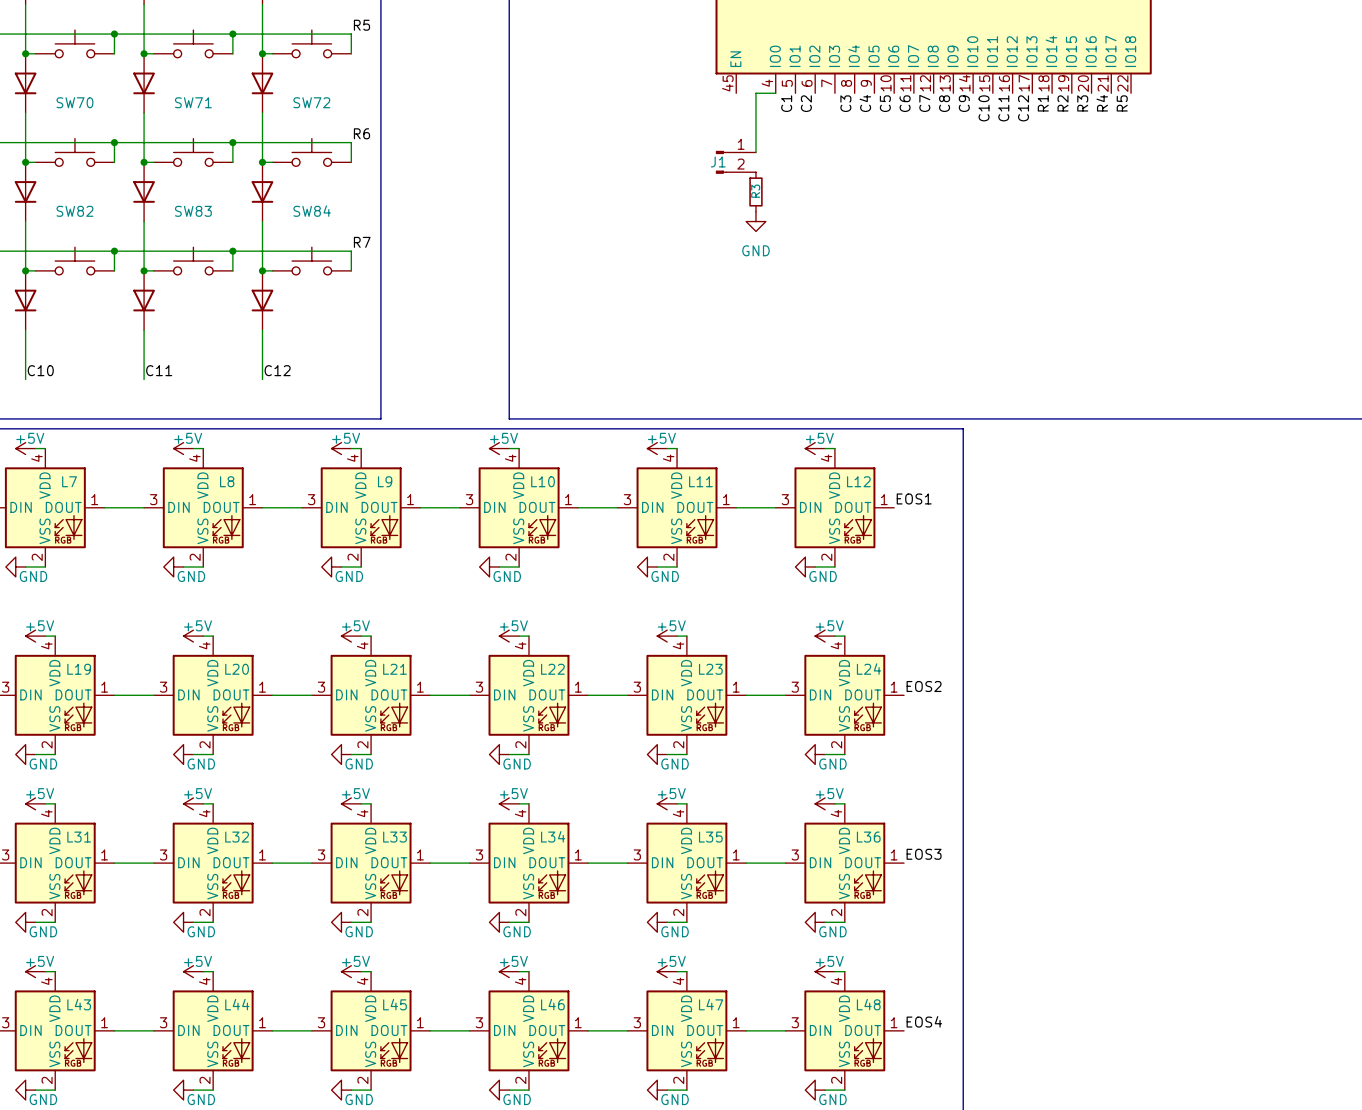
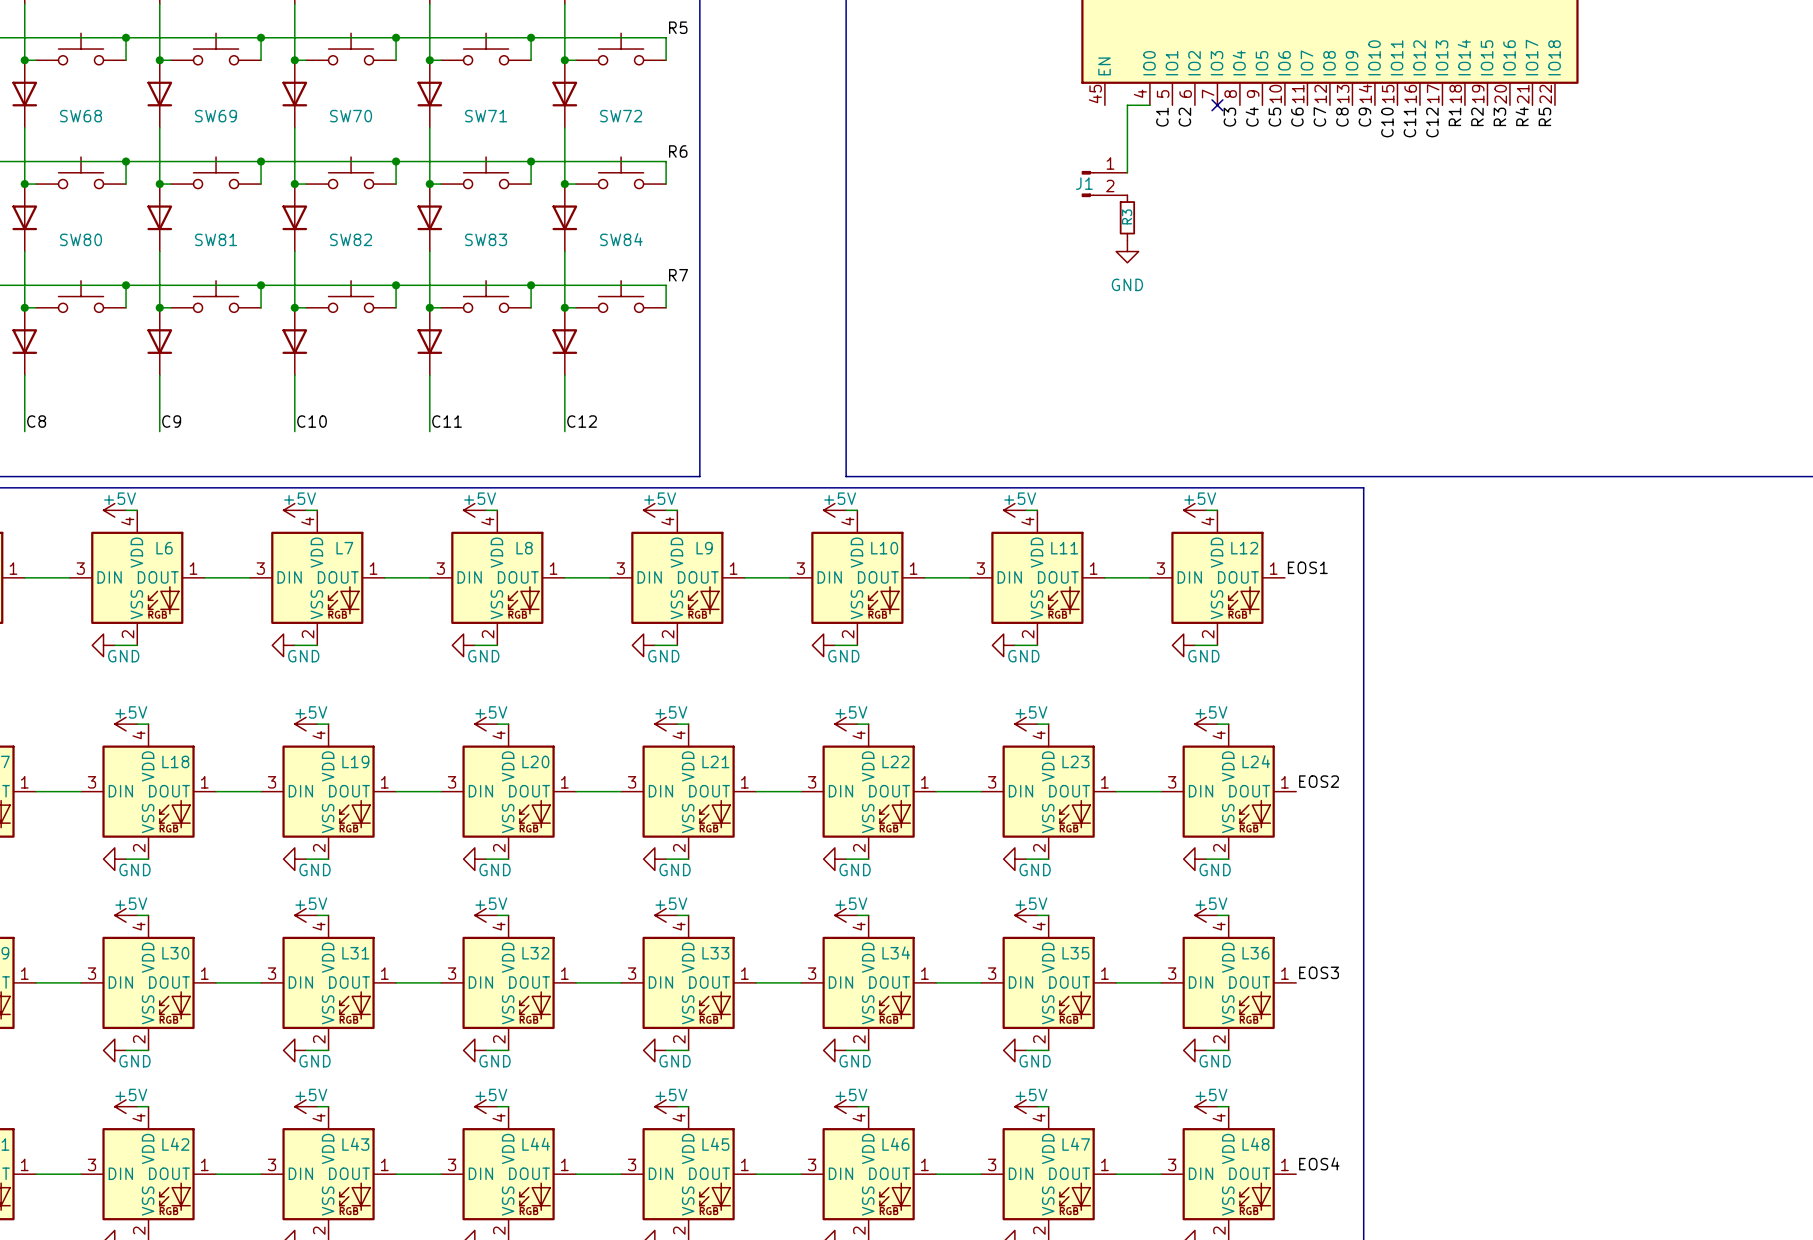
no-connect mark: none -> (1217, 105)

